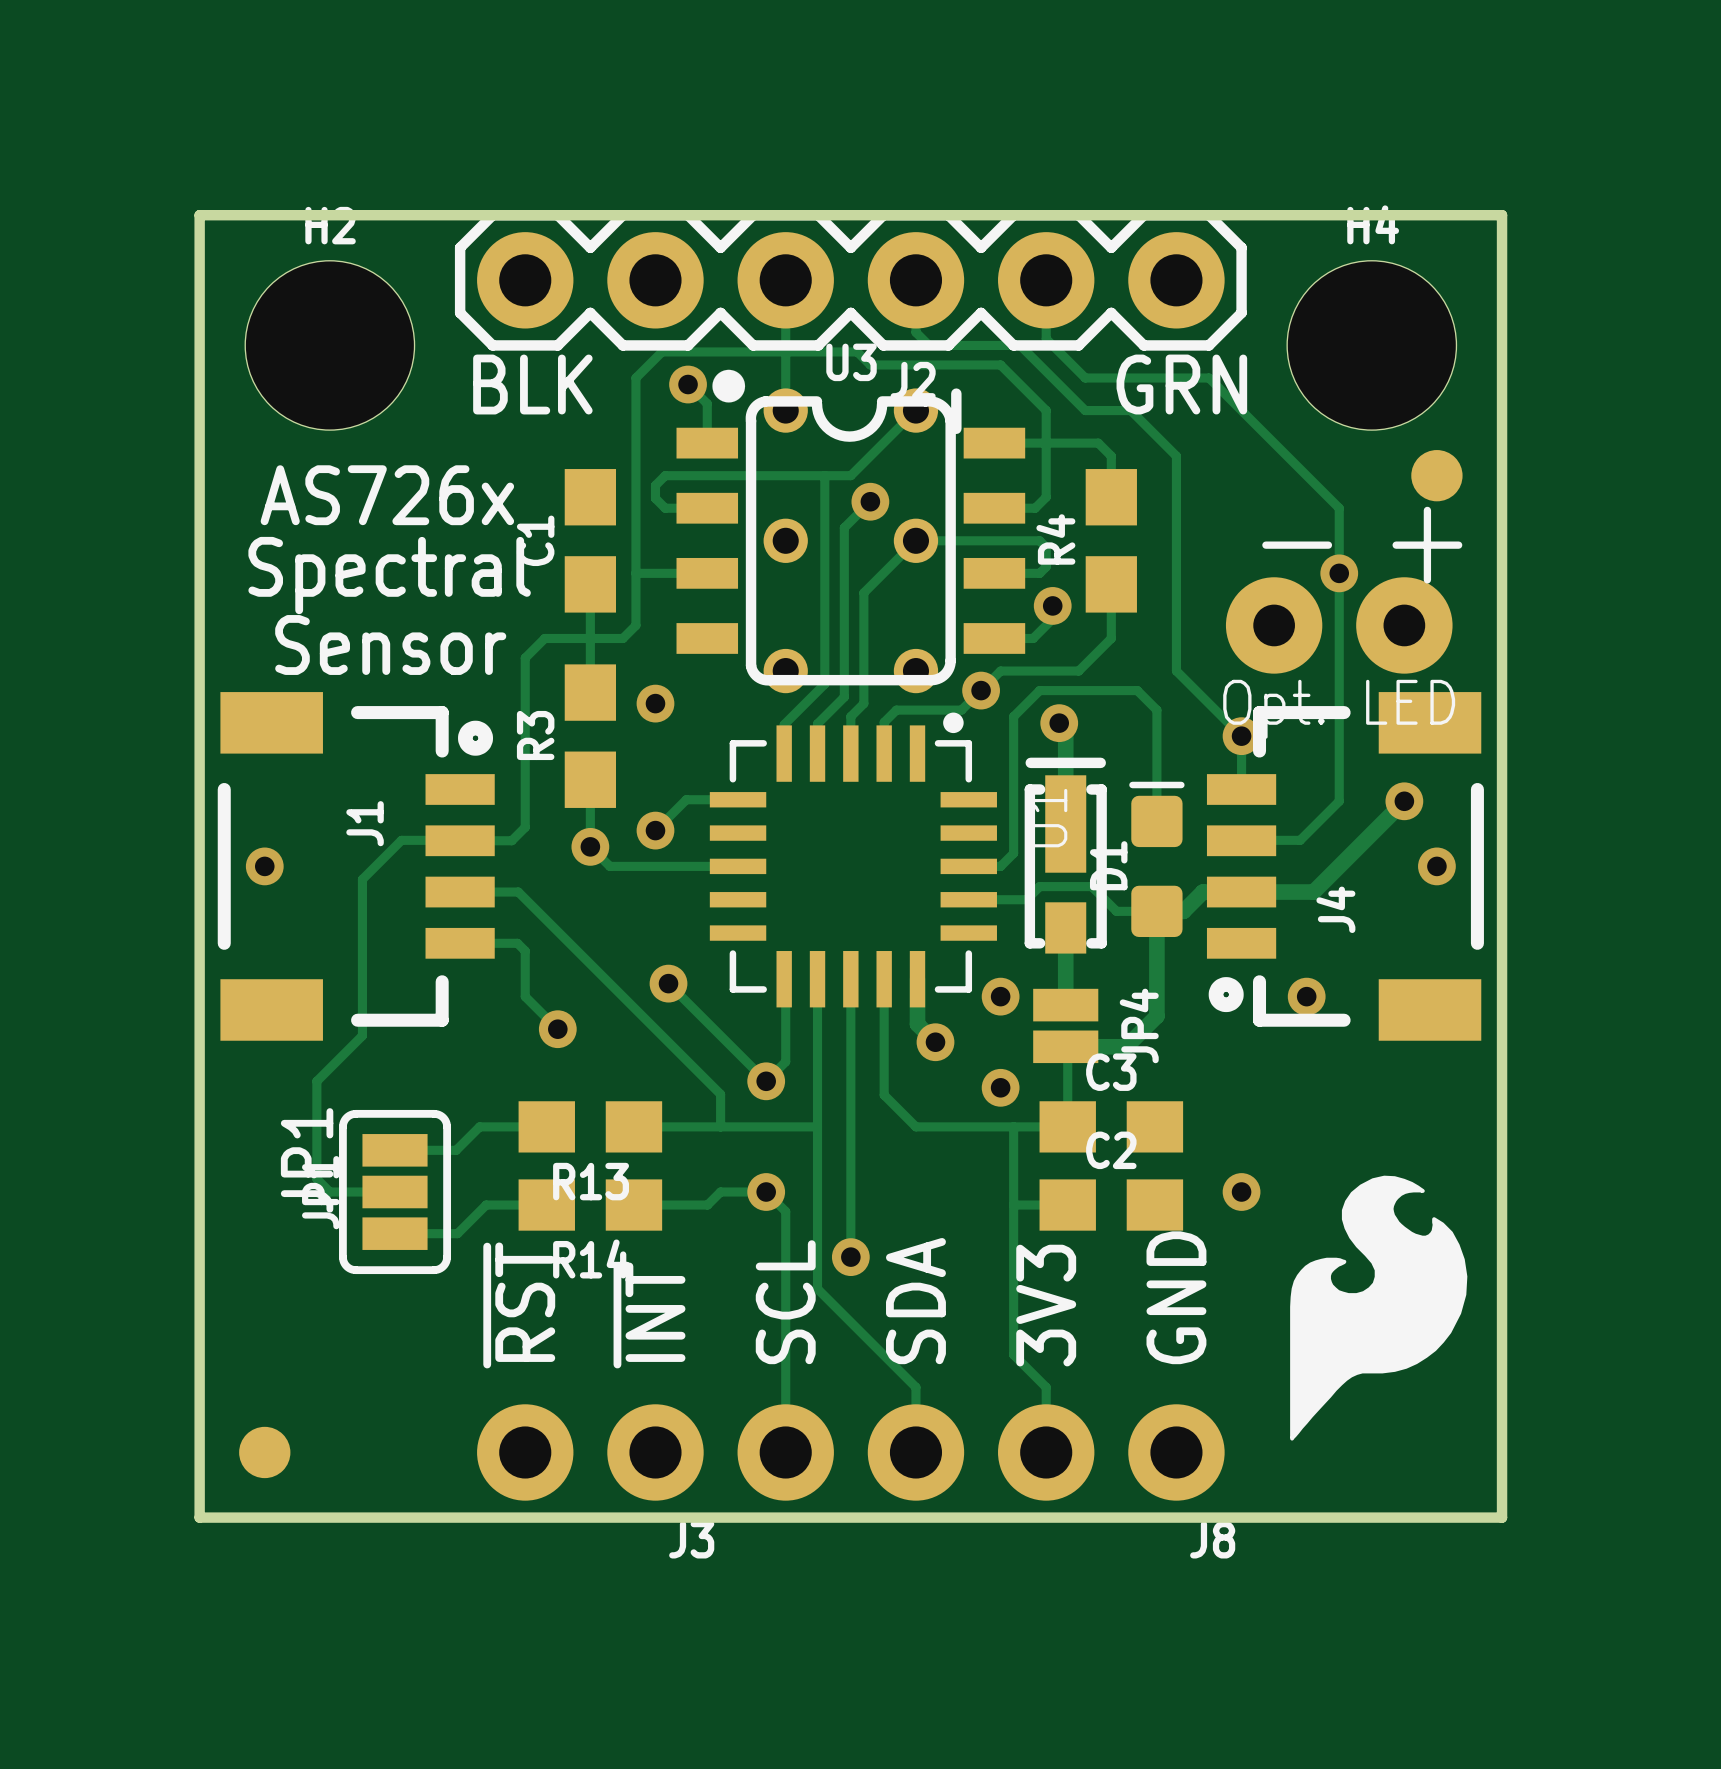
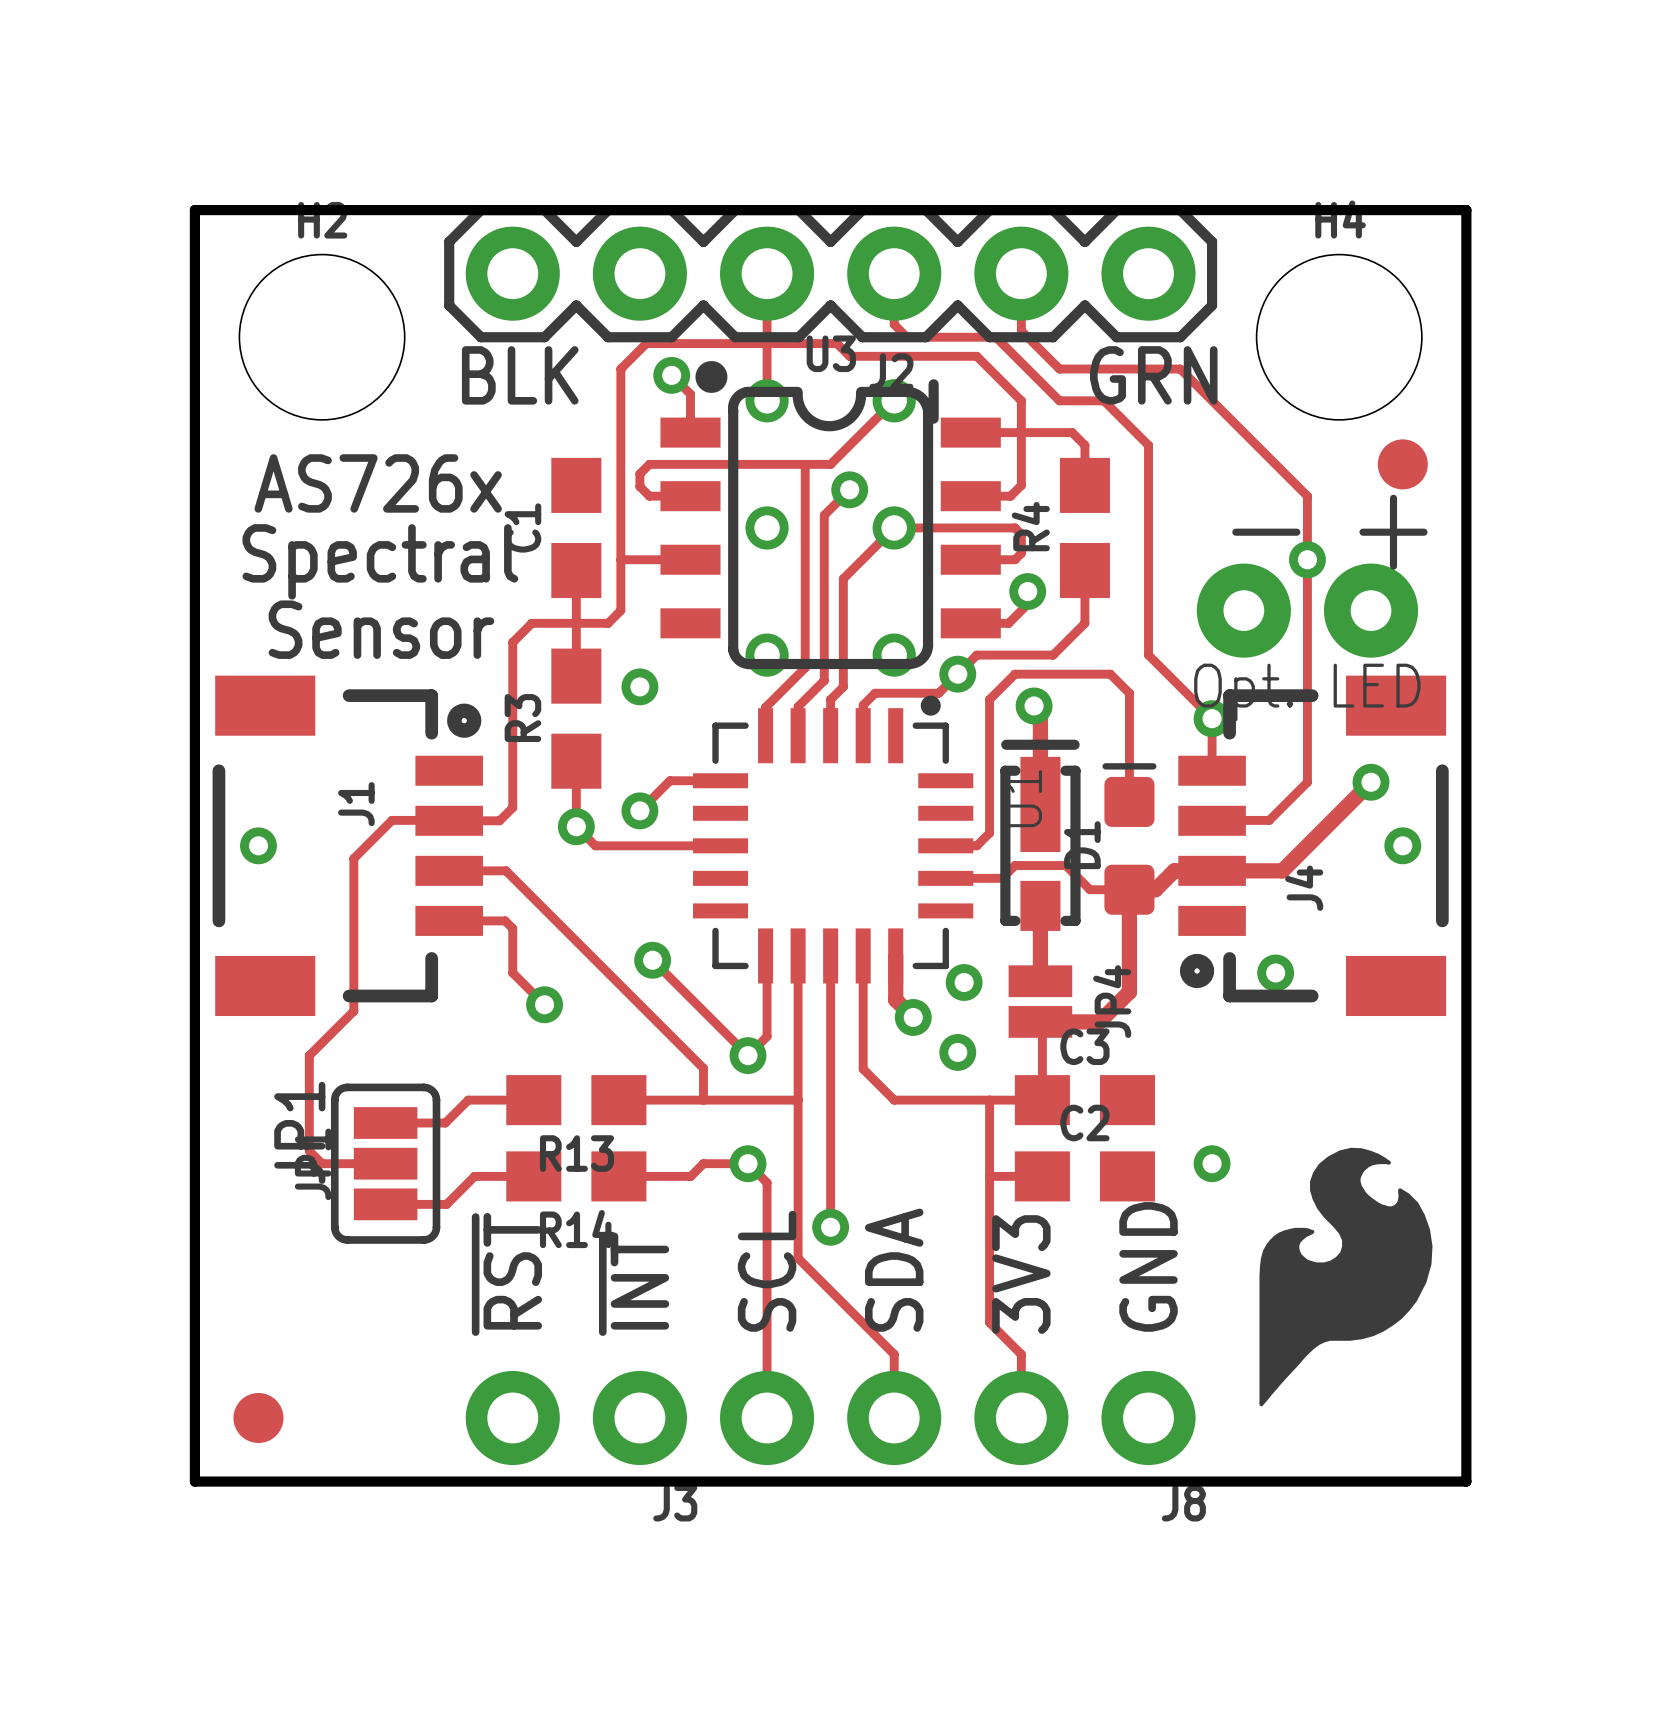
via position: (1000, 996) -> (964, 982)
via position: (1000, 1087) -> (957, 1052)

